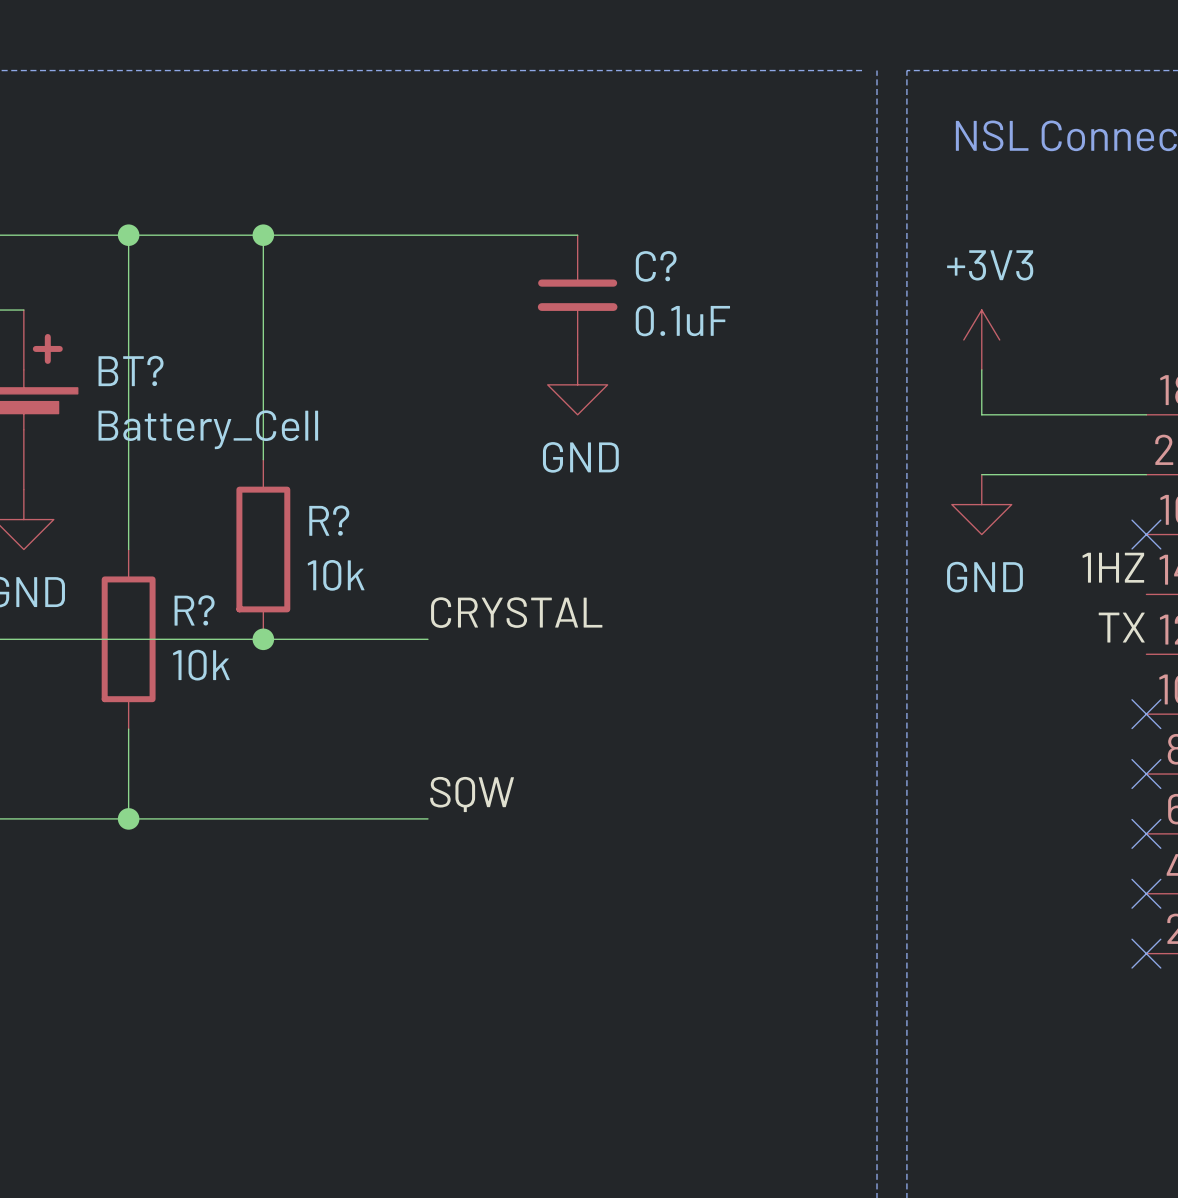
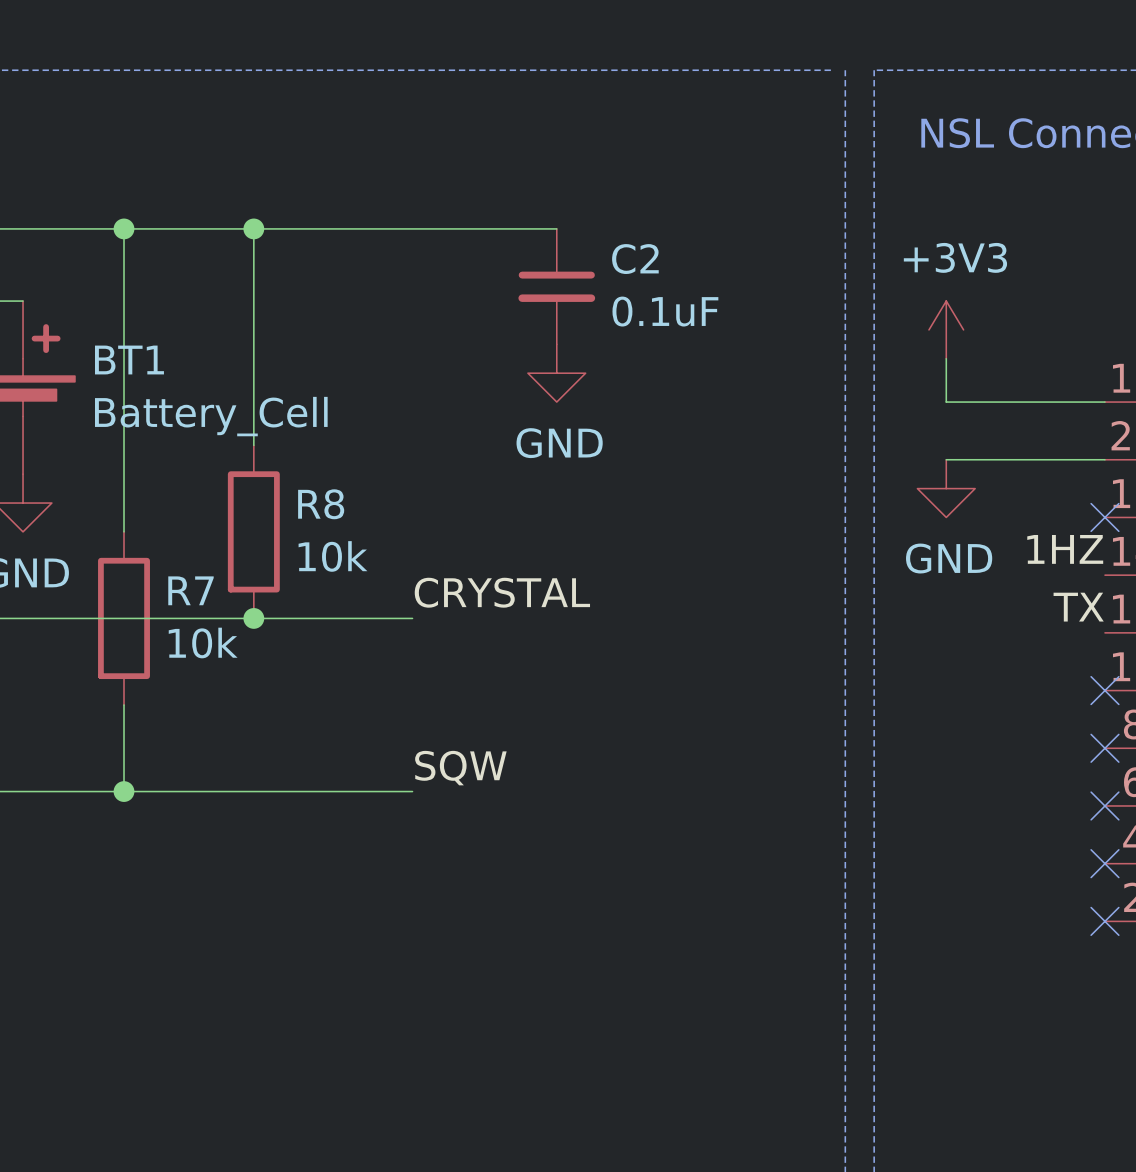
C? name: C? (656, 266) -> C2 (635, 259)
BT? name: BT? (131, 370) -> BT1 (129, 360)
R? name: R? (329, 520) -> R8 (321, 504)
R? name: R? (194, 610) -> R7 (190, 590)

